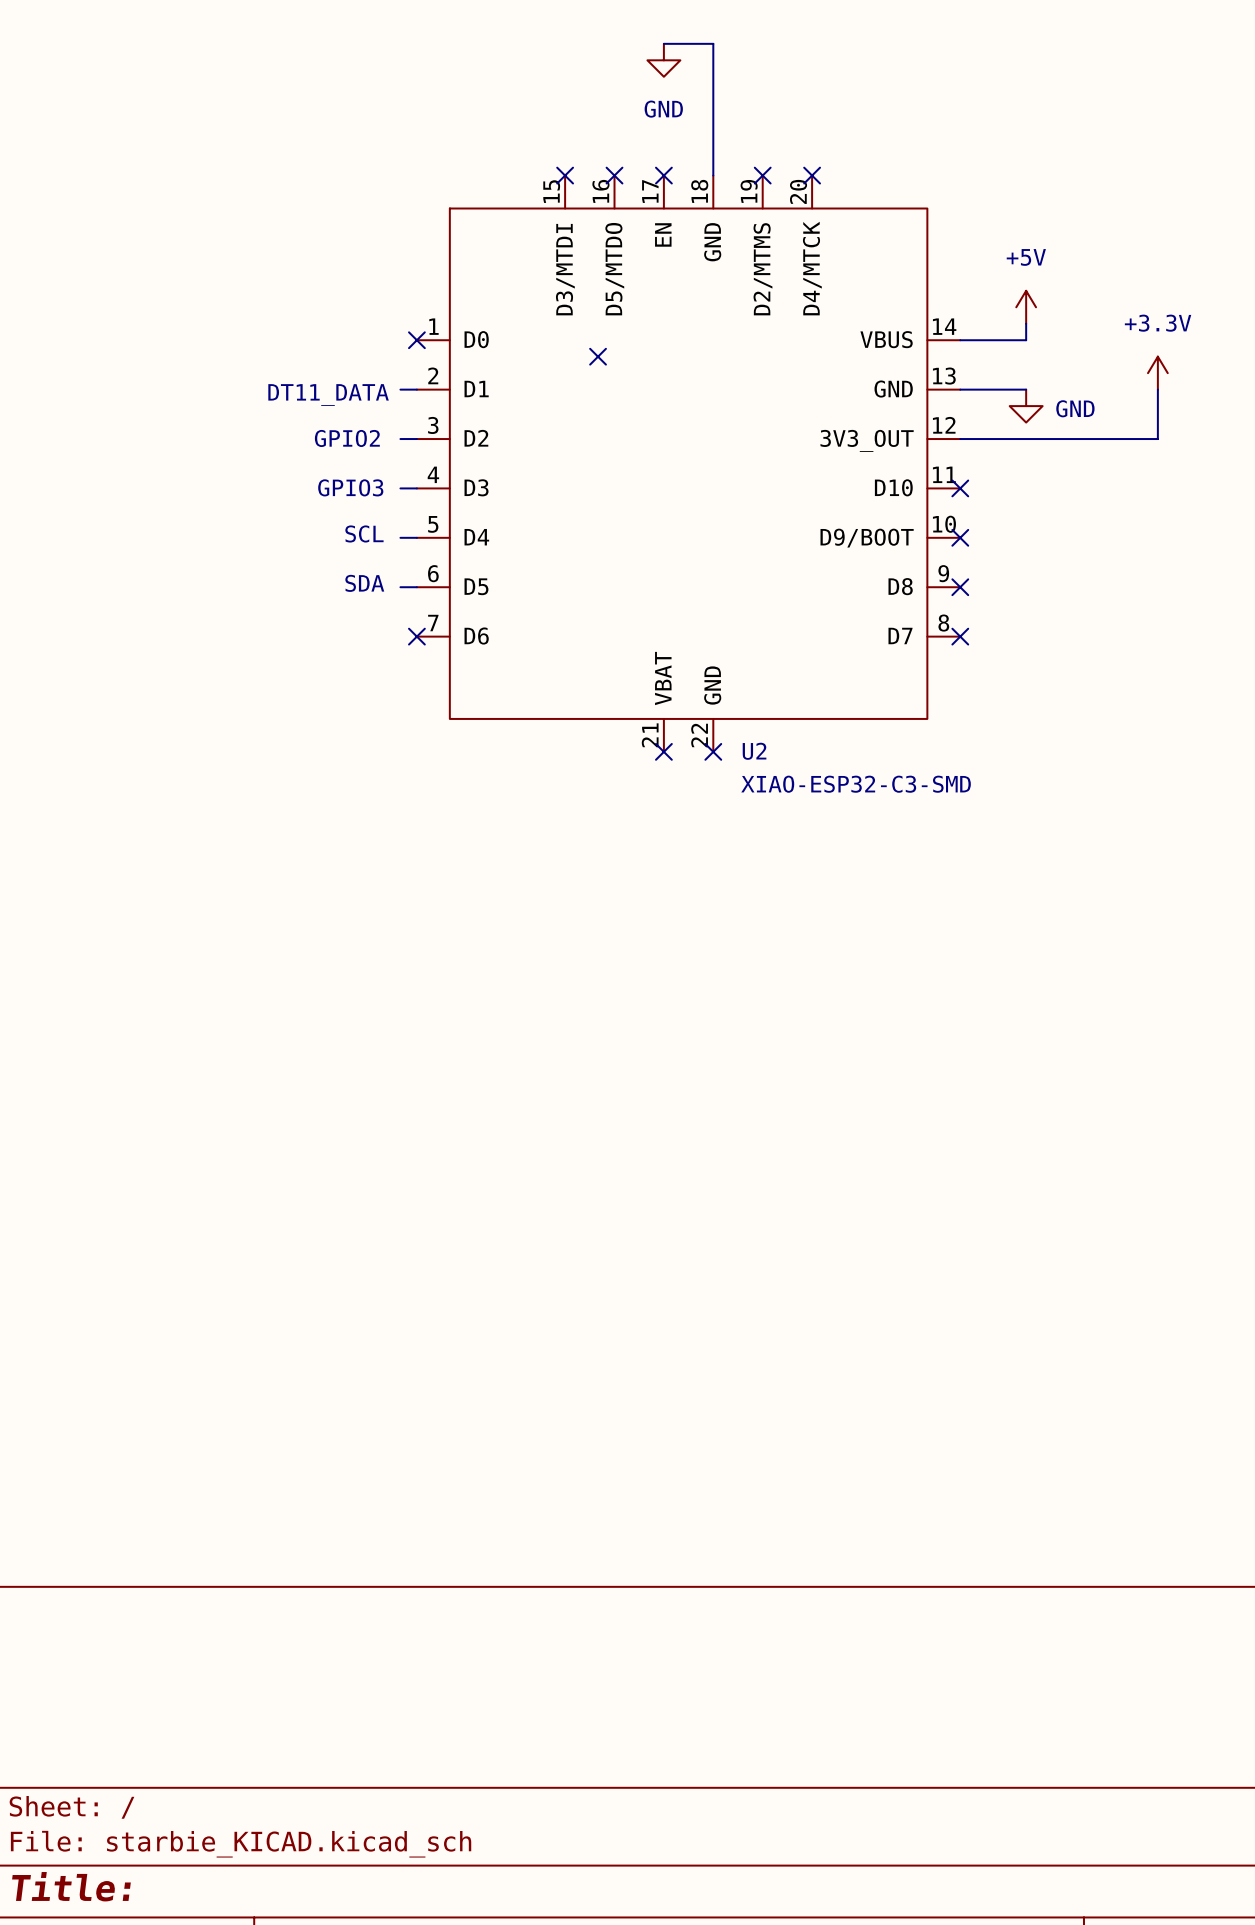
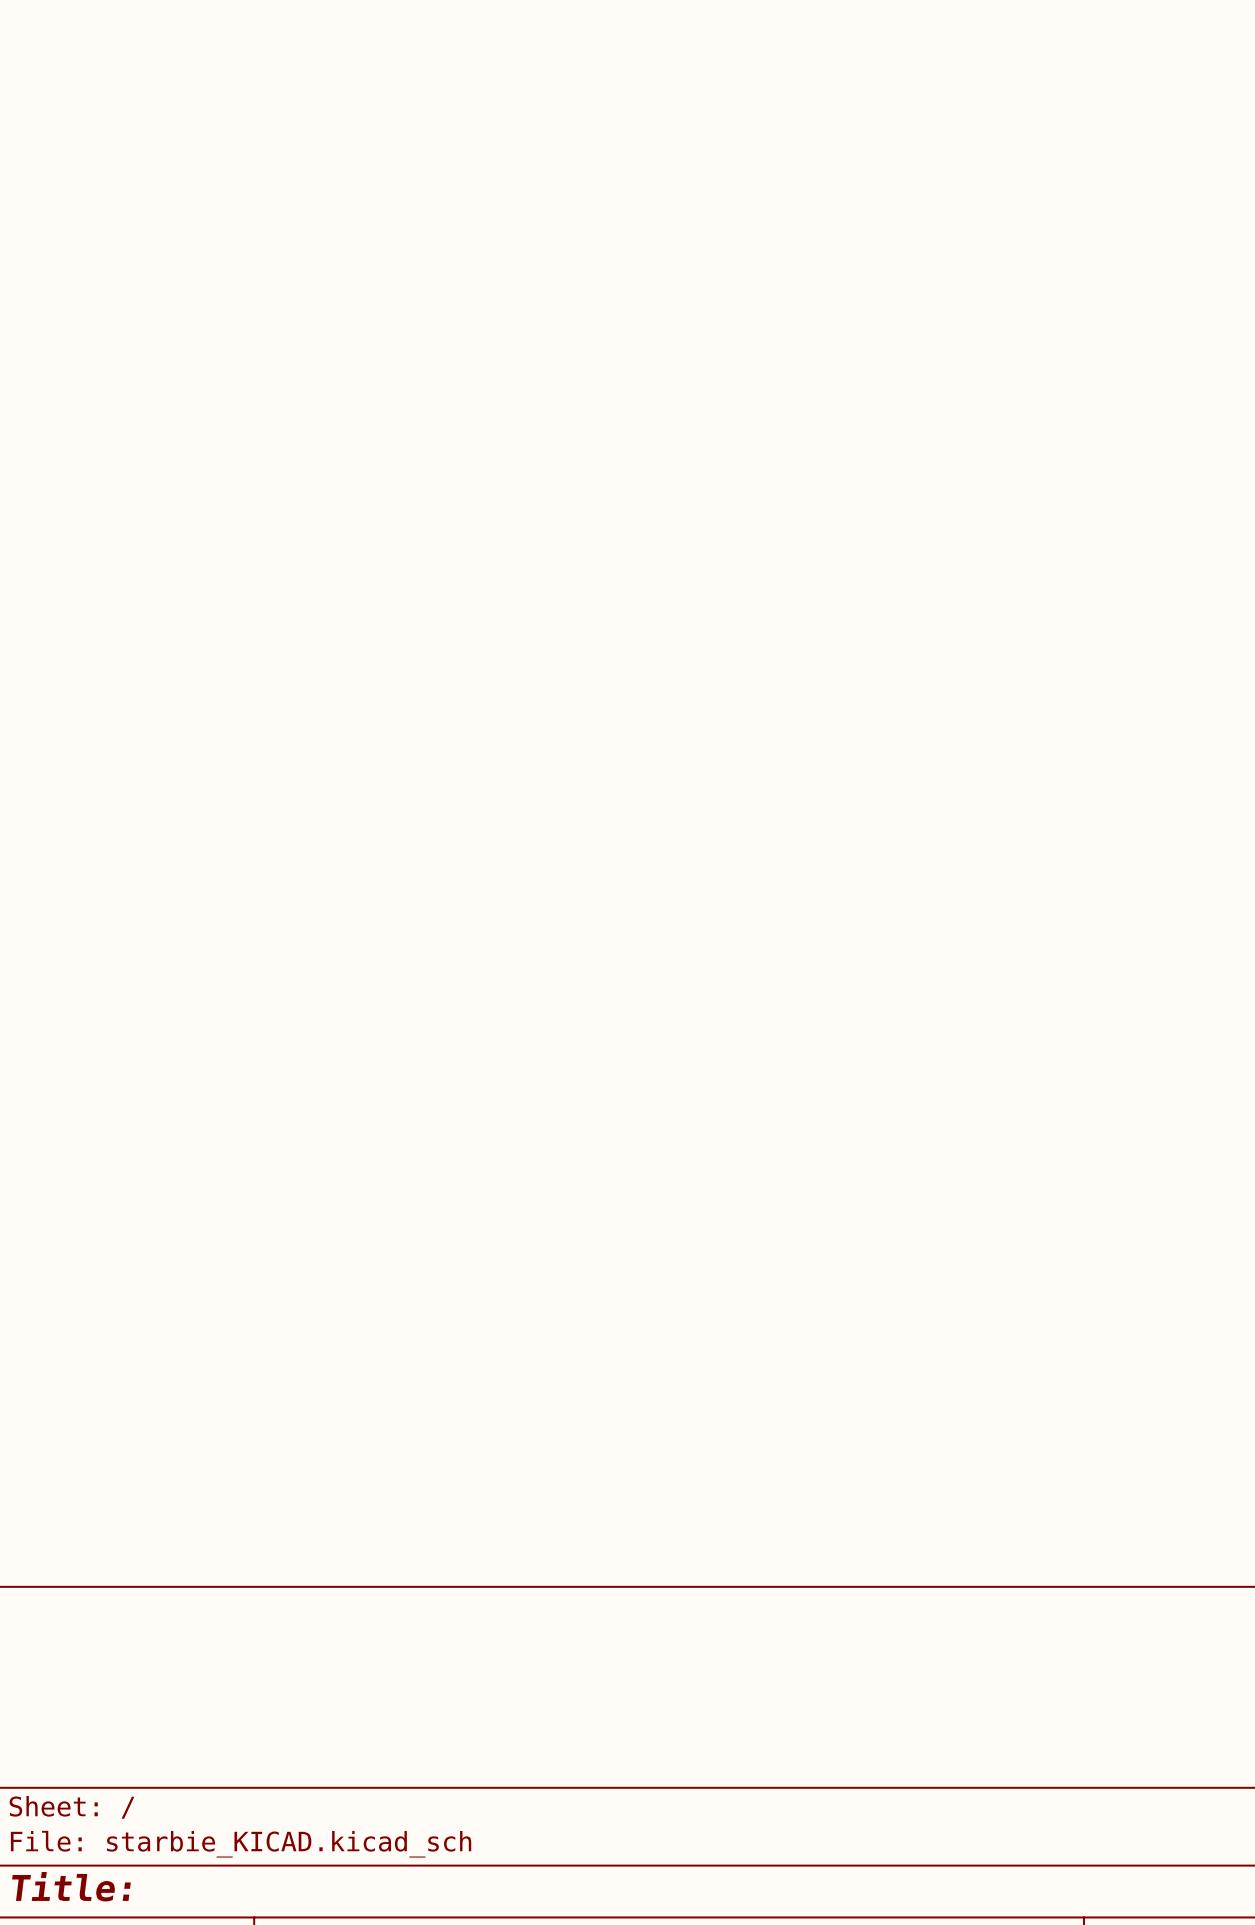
wire: (663, 43) (713, 43) (713, 175) -> none
power symbol: GND (663, 60) -> none
no-connect mark: (565, 175) -> none
no-connect mark: (614, 175) -> none
no-connect mark: (663, 175) -> none
no-connect mark: (762, 175) -> none
no-connect mark: (812, 175) -> none
power symbol: +5V (1026, 307) -> none
wire: (1026, 323) (1026, 340) (960, 340) -> none
no-connect mark: (416, 340) -> none
no-connect mark: (598, 356) -> none
power symbol: +3.3V (1157, 373) -> none
wire: (400, 389) (416, 389) -> none
wire: (960, 389) (1026, 389) -> none
wire: (1157, 389) (1157, 439) (960, 439) -> none
text: DT11_DATA (328, 395) -> none
power symbol: GND (1026, 406) -> none
text: GPIO2 (347, 438) -> none
wire: (400, 439) (416, 439) -> none
U2: XIAO-ESP32-C3-SMD (688, 463) -> none
text: GPIO3 (350, 487) -> none
wire: (400, 488) (416, 488) -> none
no-connect mark: (960, 488) -> none
text: SCL (364, 533) -> none
wire: (400, 537) (416, 537) -> none
no-connect mark: (960, 537) -> none
text: SDA (364, 583) -> none
wire: (400, 587) (416, 587) -> none
no-connect mark: (960, 587) -> none
no-connect mark: (416, 636) -> none
no-connect mark: (960, 636) -> none
no-connect mark: (663, 751) -> none
no-connect mark: (713, 751) -> none

